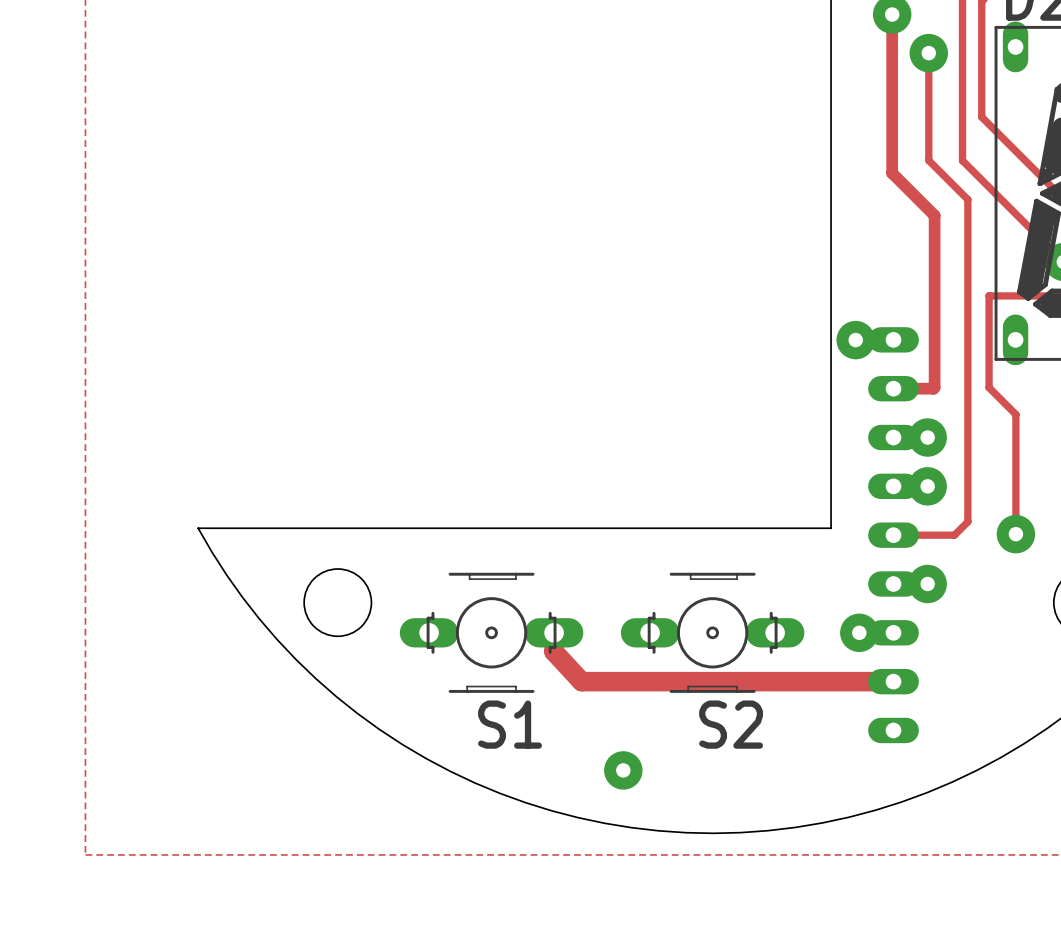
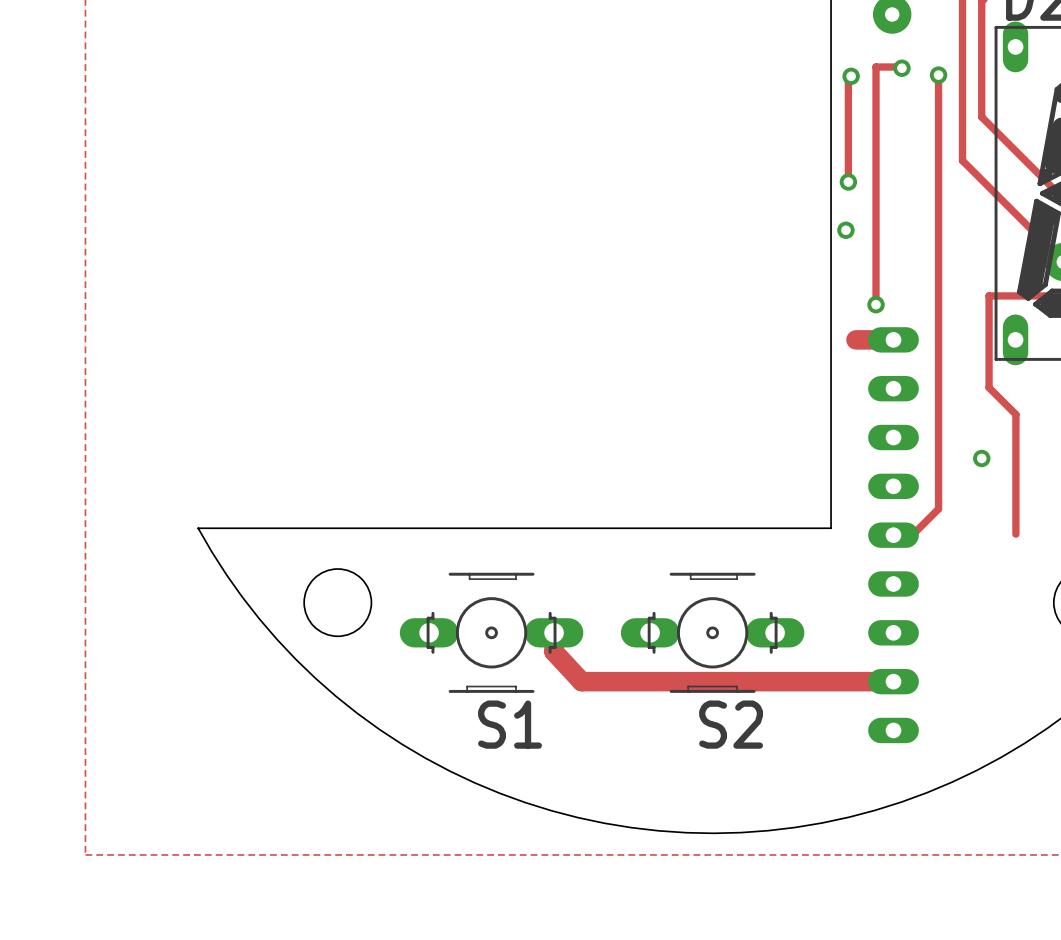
track: (892, 14) (892, 173) (934, 215) (934, 387) (893, 388) -> none
track: (928, 53) (928, 160) (967, 199) (967, 521) (954, 535) (912, 535) -> (938, 75) (938, 508) (912, 535)
via: (928, 53) -> none
track: none -> (901, 68) (876, 67) (876, 304)
via: none -> (901, 68)
via: none -> (938, 75)
track: none -> (851, 76) (848, 79) (848, 182)
via: none -> (851, 76)
via: none -> (848, 182)
via: none -> (845, 230)
via: none -> (876, 304)
via: (855, 340) -> none
via: (927, 437) -> none
via: none -> (981, 458)
via: (927, 486) -> none
via: (1015, 534) -> none
via: (927, 583) -> none
via: (859, 632) -> none
via: (623, 770) -> none

